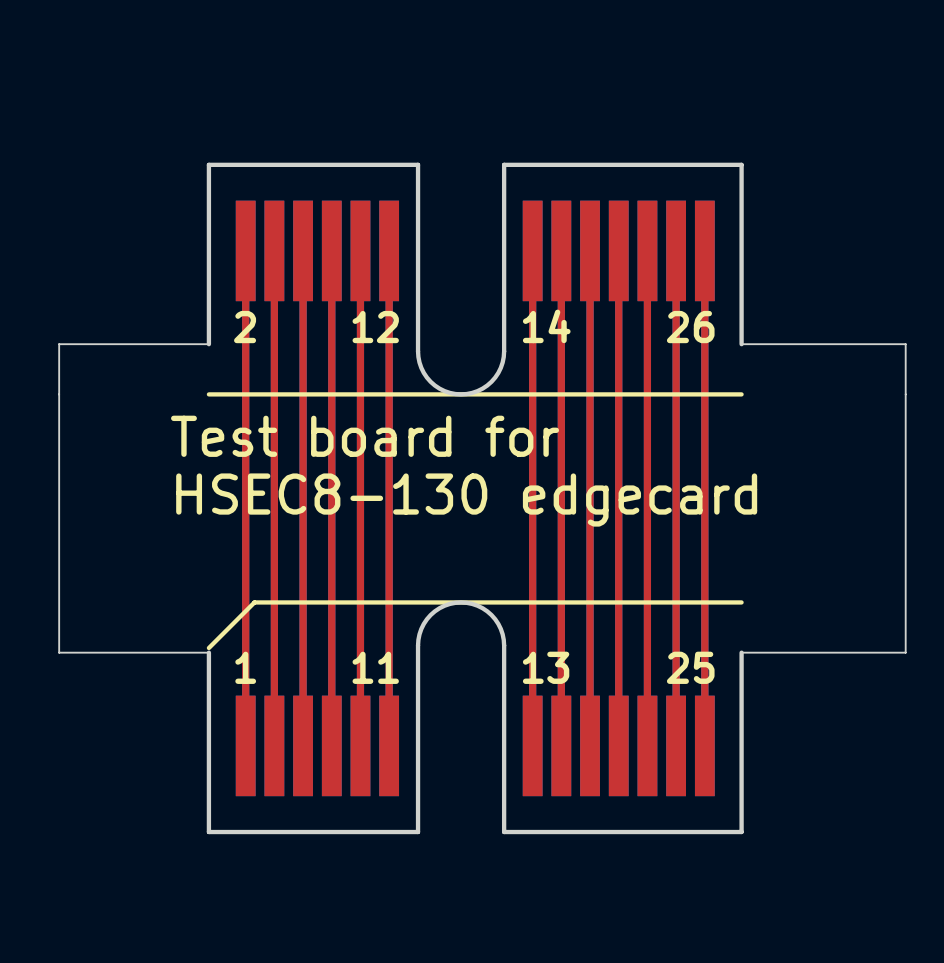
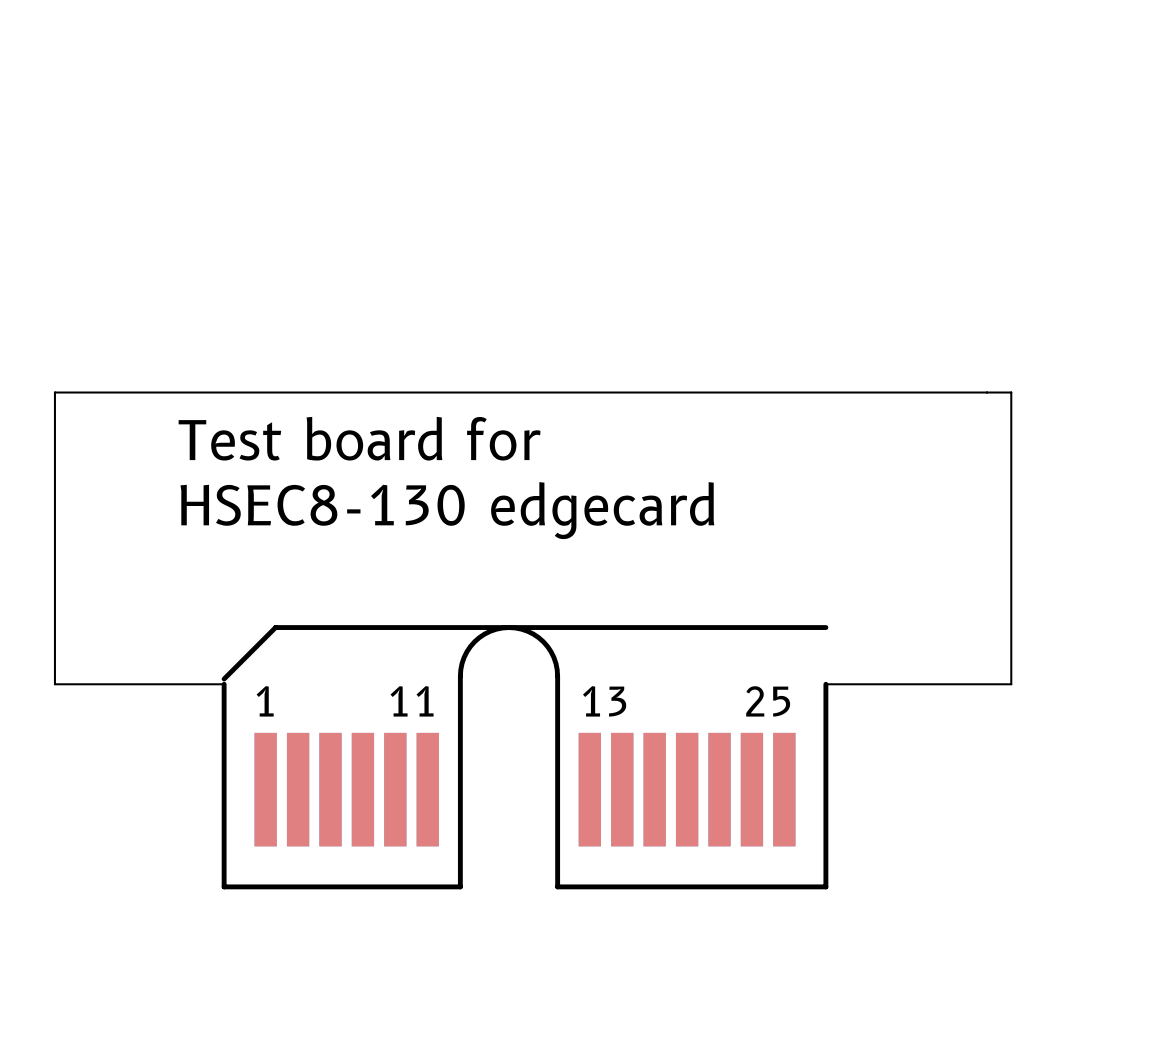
top track: (245, 250) (245, 745) -> none
top track: (274, 250) (274, 745) -> none
top track: (303, 250) (303, 745) -> none
top track: (331, 250) (331, 745) -> none
top track: (360, 250) (360, 745) -> none
top track: (389, 250) (389, 745) -> none
top track: (532, 250) (532, 745) -> none
top track: (561, 250) (561, 745) -> none
top track: (590, 250) (590, 745) -> none
top track: (618, 250) (618, 745) -> none
top track: (647, 250) (647, 745) -> none
top track: (676, 250) (676, 745) -> none
top track: (704, 250) (704, 745) -> none
part: (475, 279) -> none
board edge: (208, 344) (59, 344) (59, 394) -> none
board edge: (741, 344) (905, 344) (905, 394) -> (54, 392) (1011, 392)

